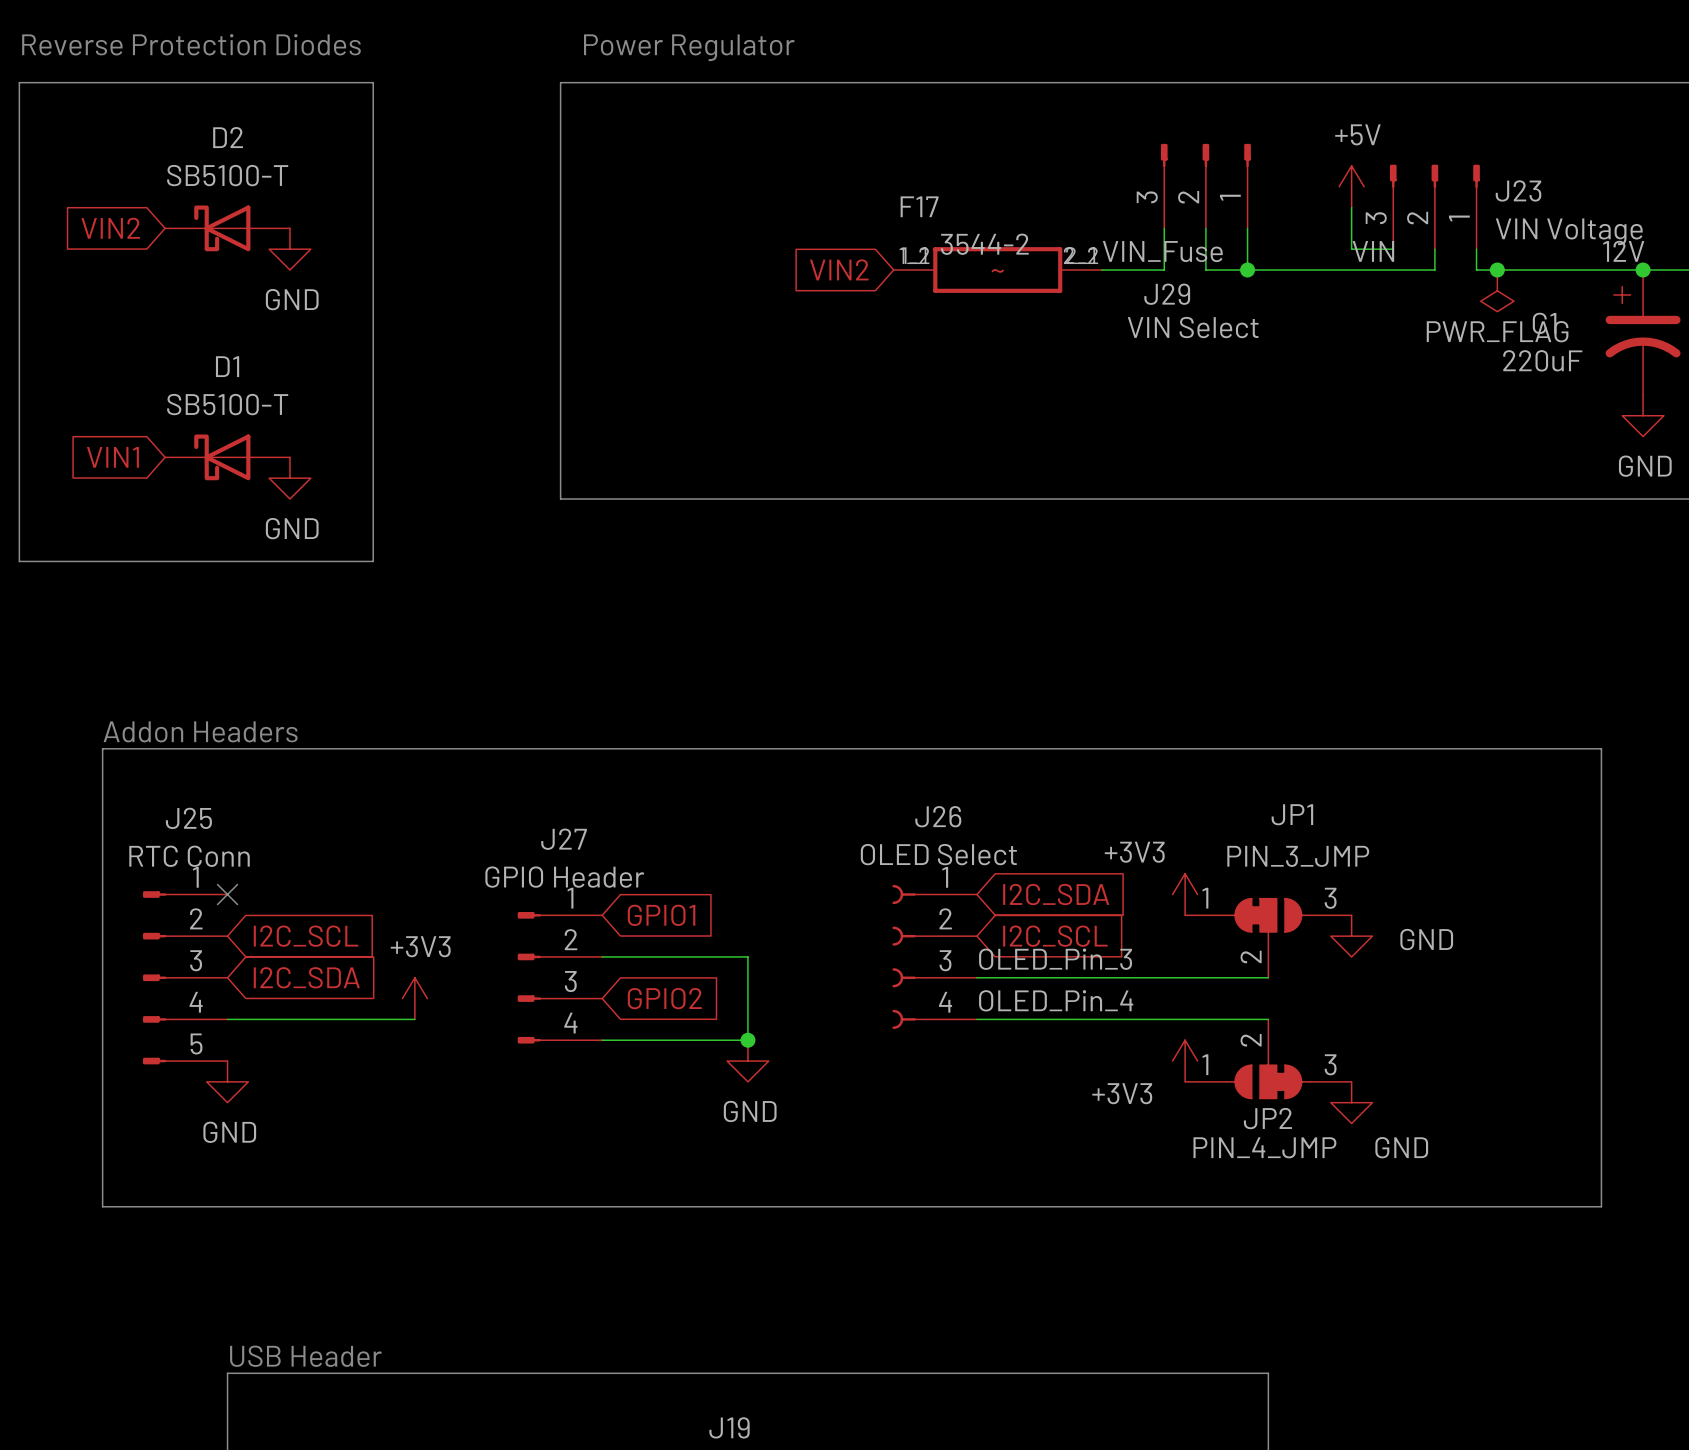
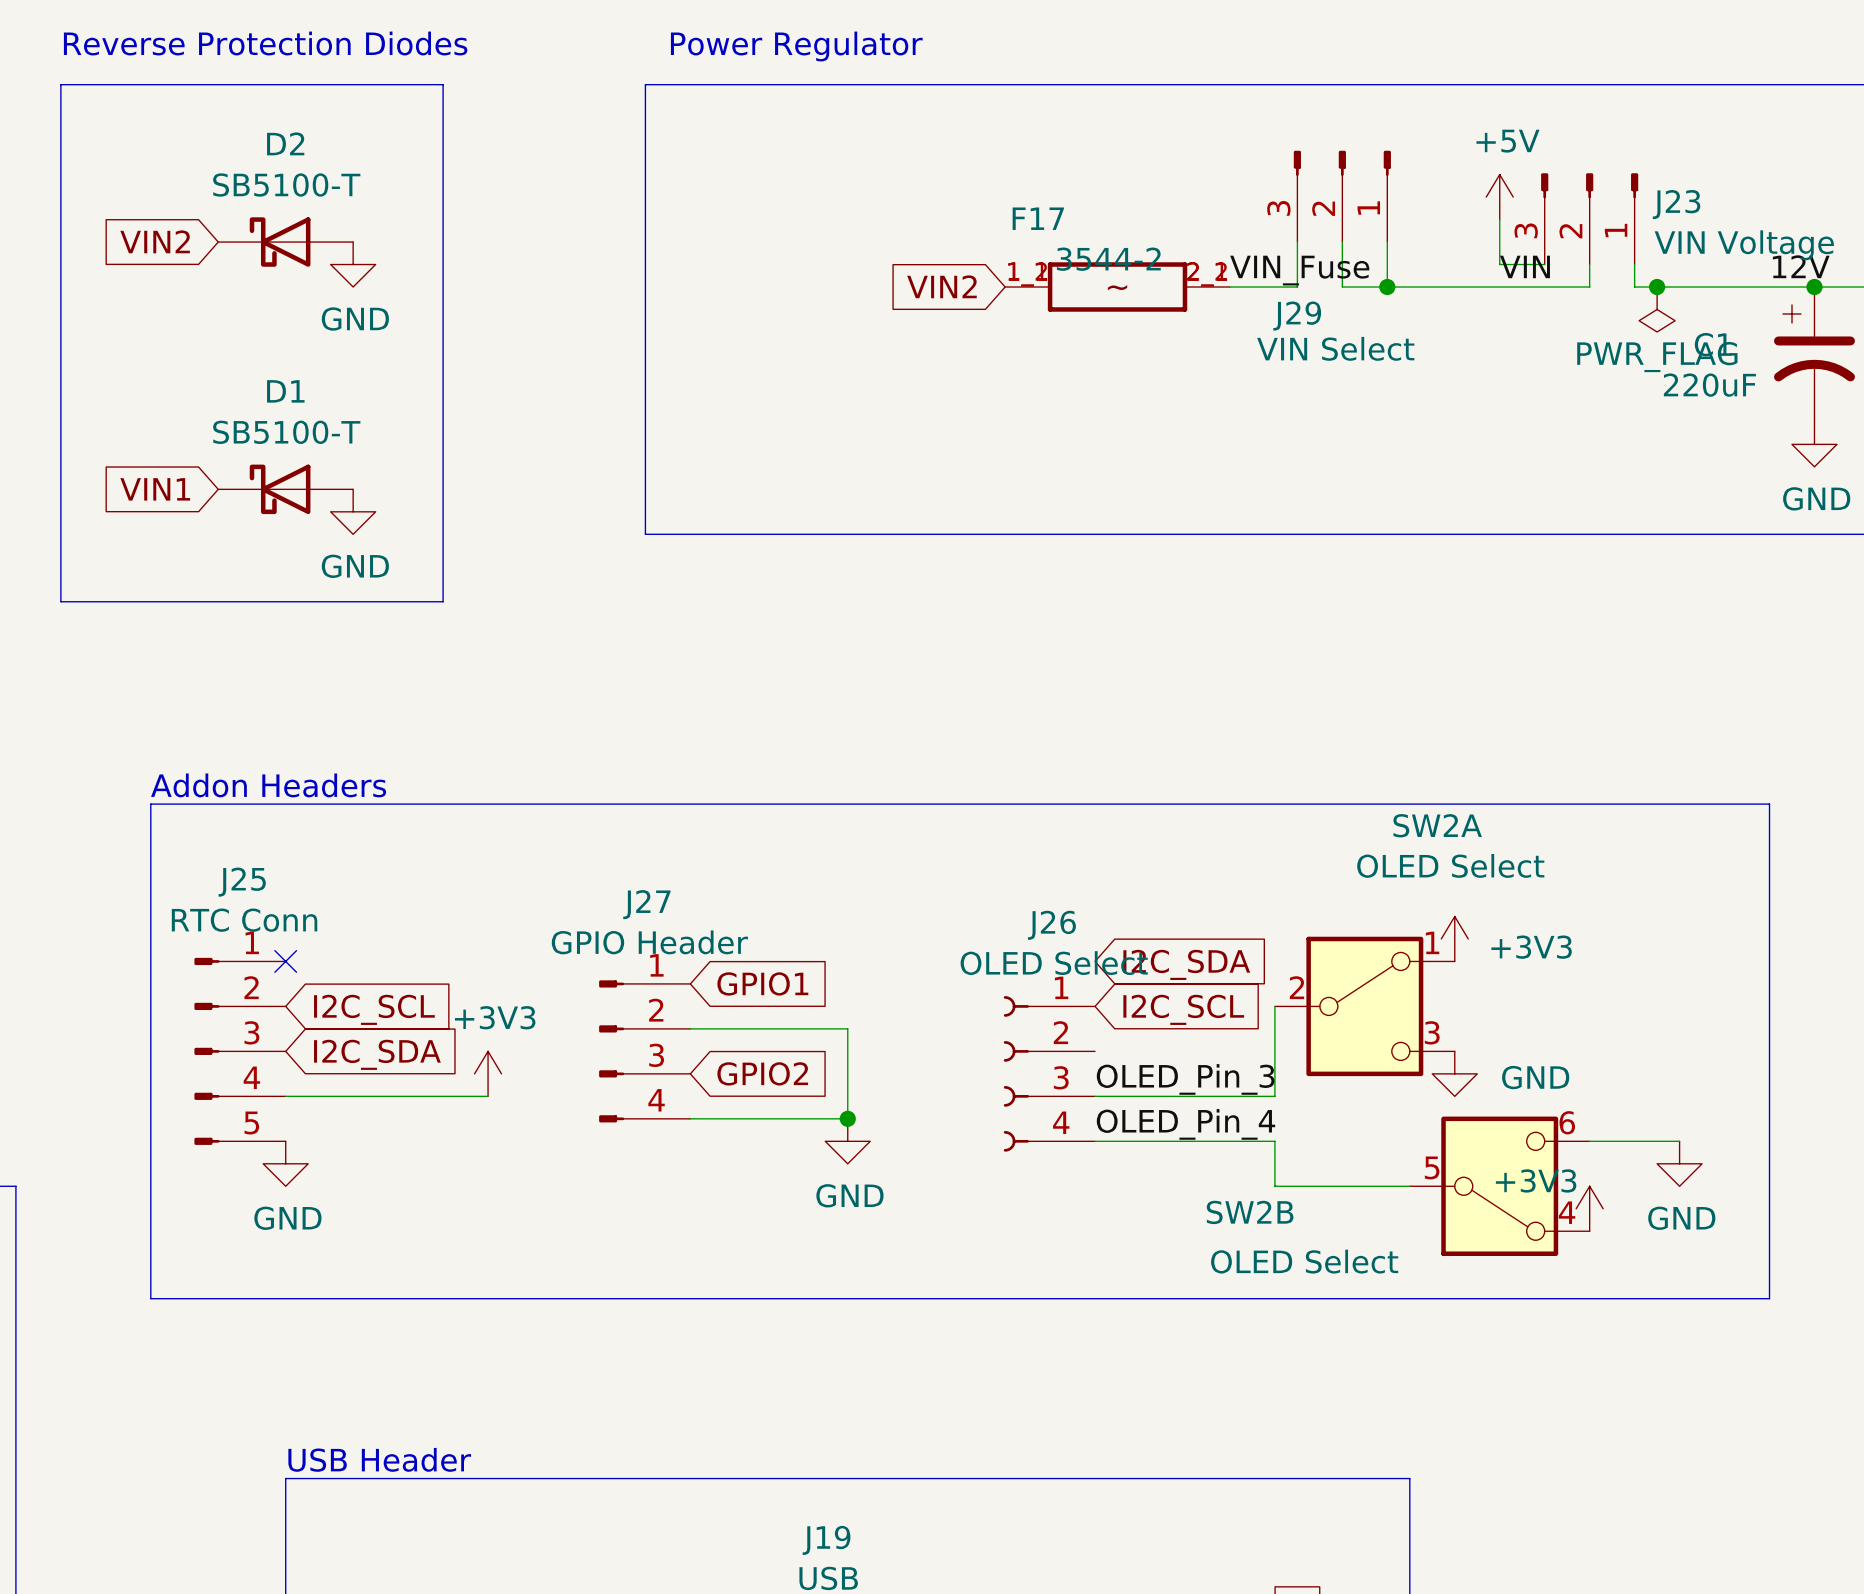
power symbol: none -> +3V3 (1454, 938)
power symbol: +3V3 (1185, 894) -> none
SW2A: none -> OLED Select (1364, 1006)
power symbol: GND (1351, 936) -> none
JP1: PIN_3_JMP (1268, 938) -> none
J26 position: (934, 956) -> (1049, 1073)
label: OLED_Pin_3 (1055, 959) -> none
wire: (976, 977) (1268, 977) -> none
power symbol: none -> GND (1454, 1073)
label: OLED_Pin_4 (1056, 1000) -> OLED_Pin_3 (1185, 1079)
wire: (1143, 1019) (1268, 1019) -> (1274, 1096) (1274, 1006)
label: none -> OLED_Pin_4 (1185, 1124)
JP2: PIN_4_JMP (1268, 1058) -> none
wire: none -> (1095, 1141) (1274, 1141) (1274, 1186) (1409, 1186)
power symbol: +3V3 (1185, 1061) -> none
wire: none -> (1589, 1141) (1679, 1141)
power symbol: none -> GND (1679, 1163)
SW2B: none -> OLED Select (1499, 1186)
power symbol: GND (1351, 1102) -> none
power symbol: none -> +3V3 (1589, 1208)

